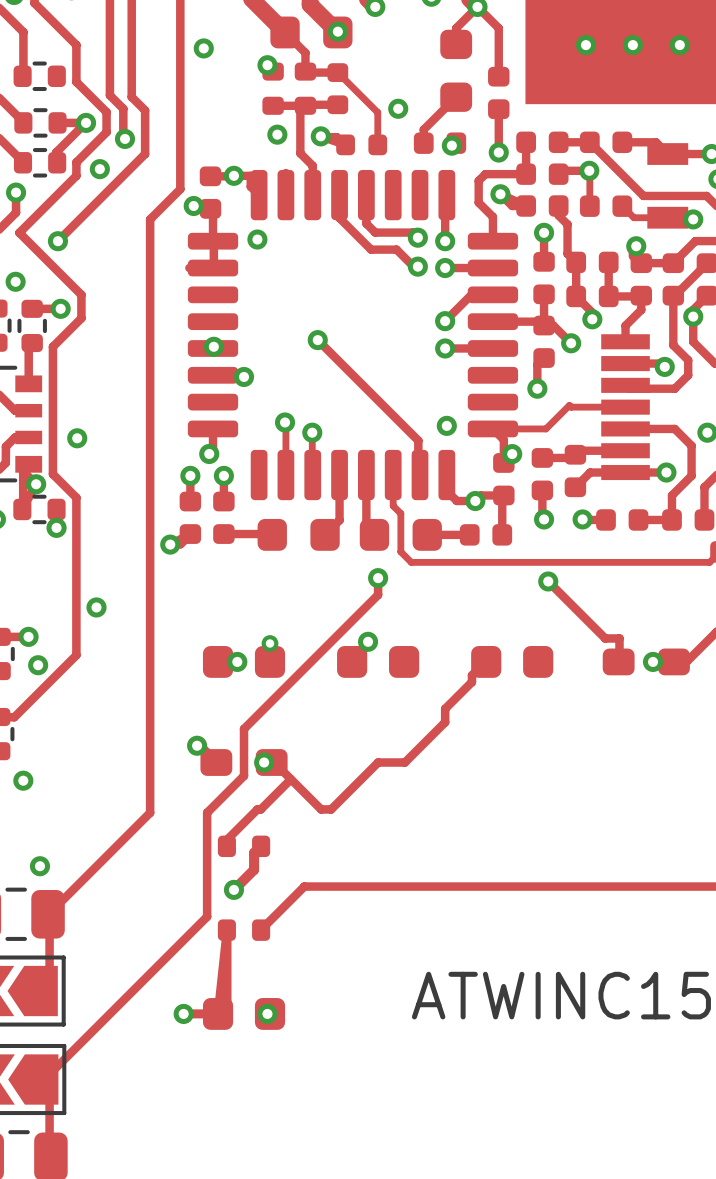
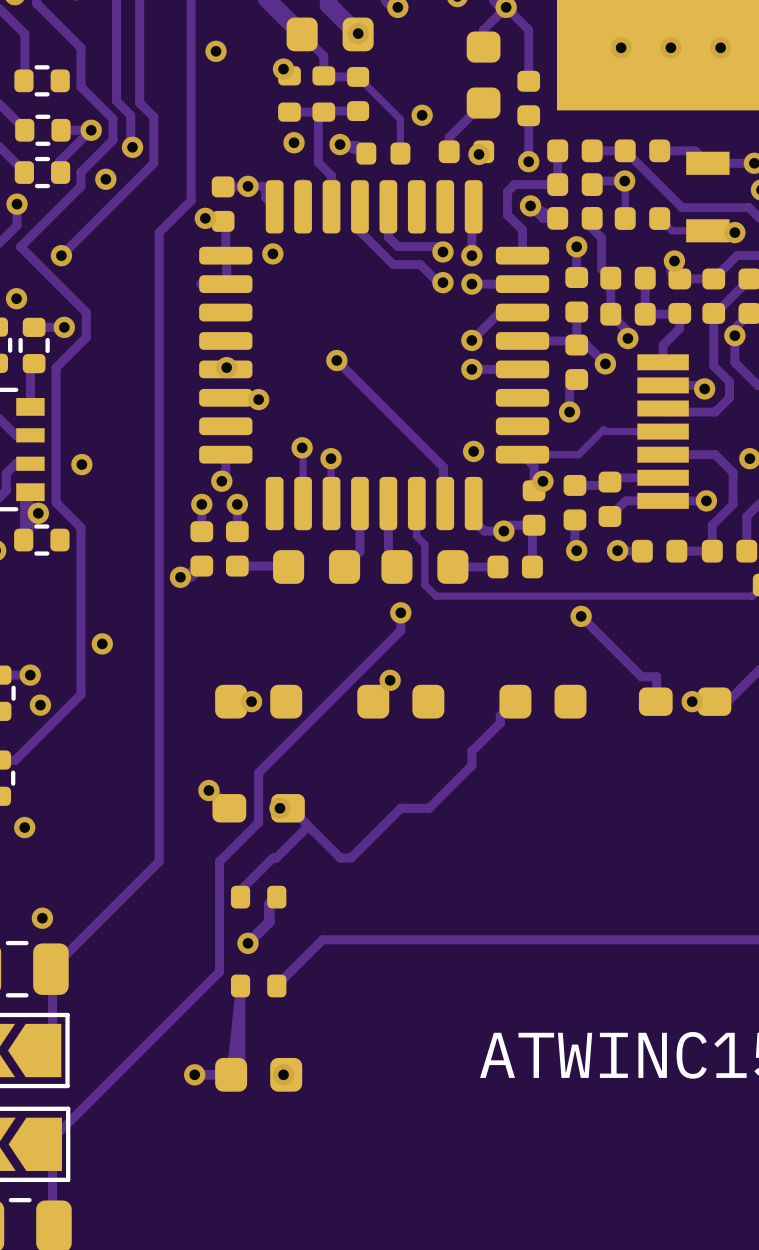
via: (56, 527) -> none
via: (270, 643) -> none

